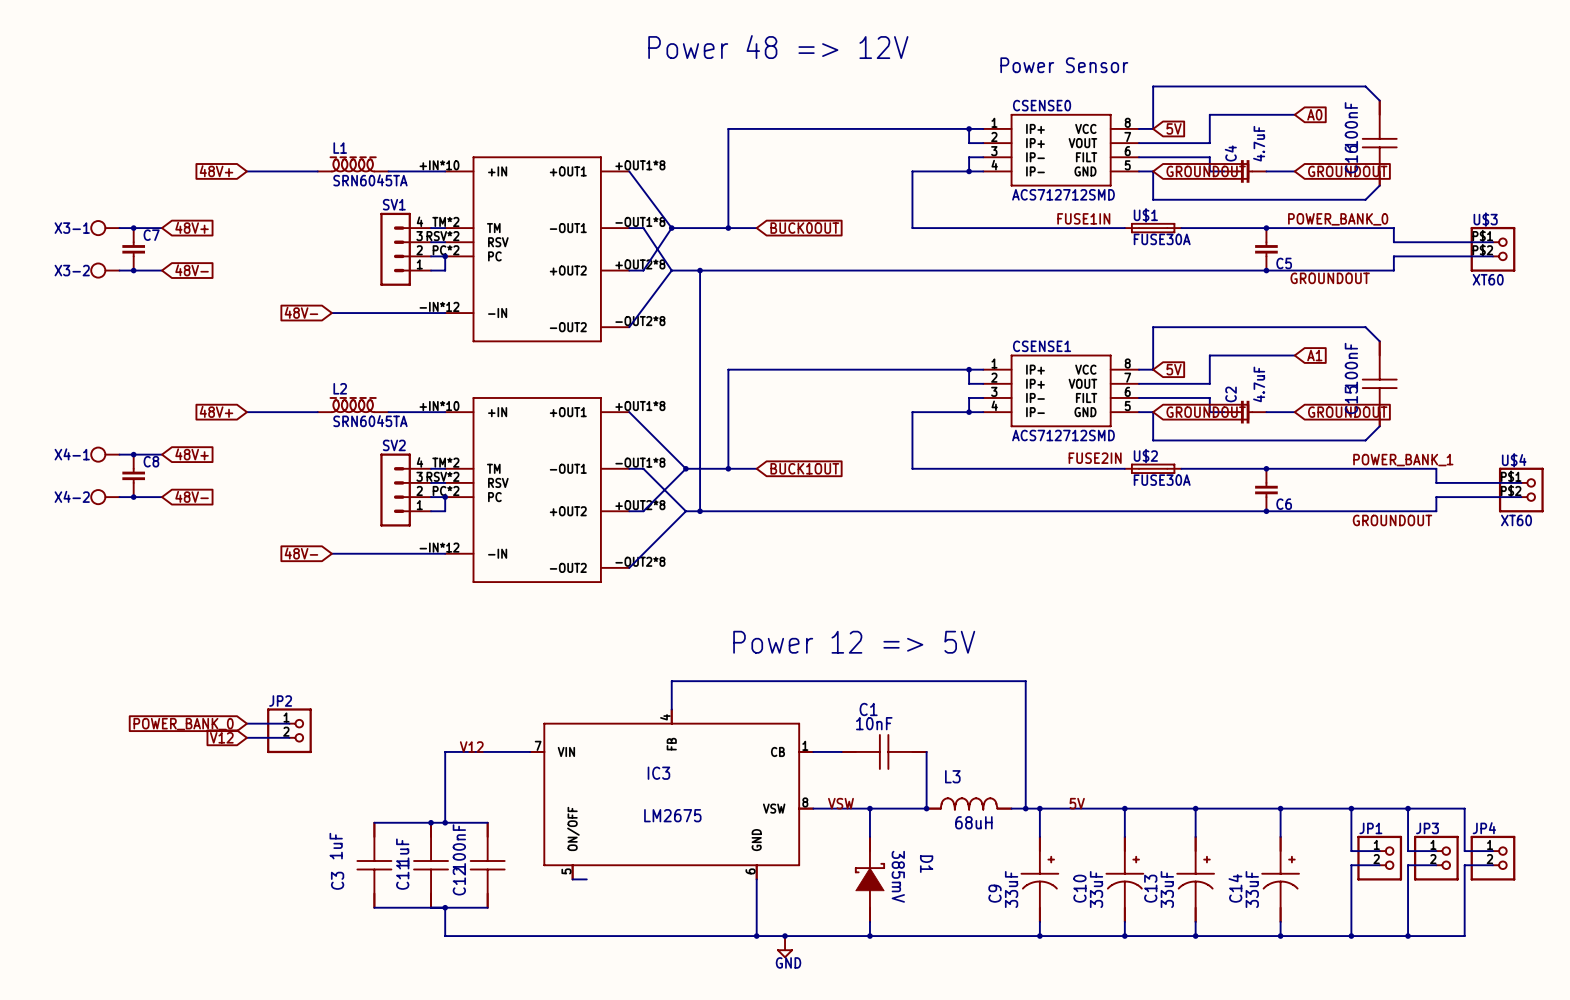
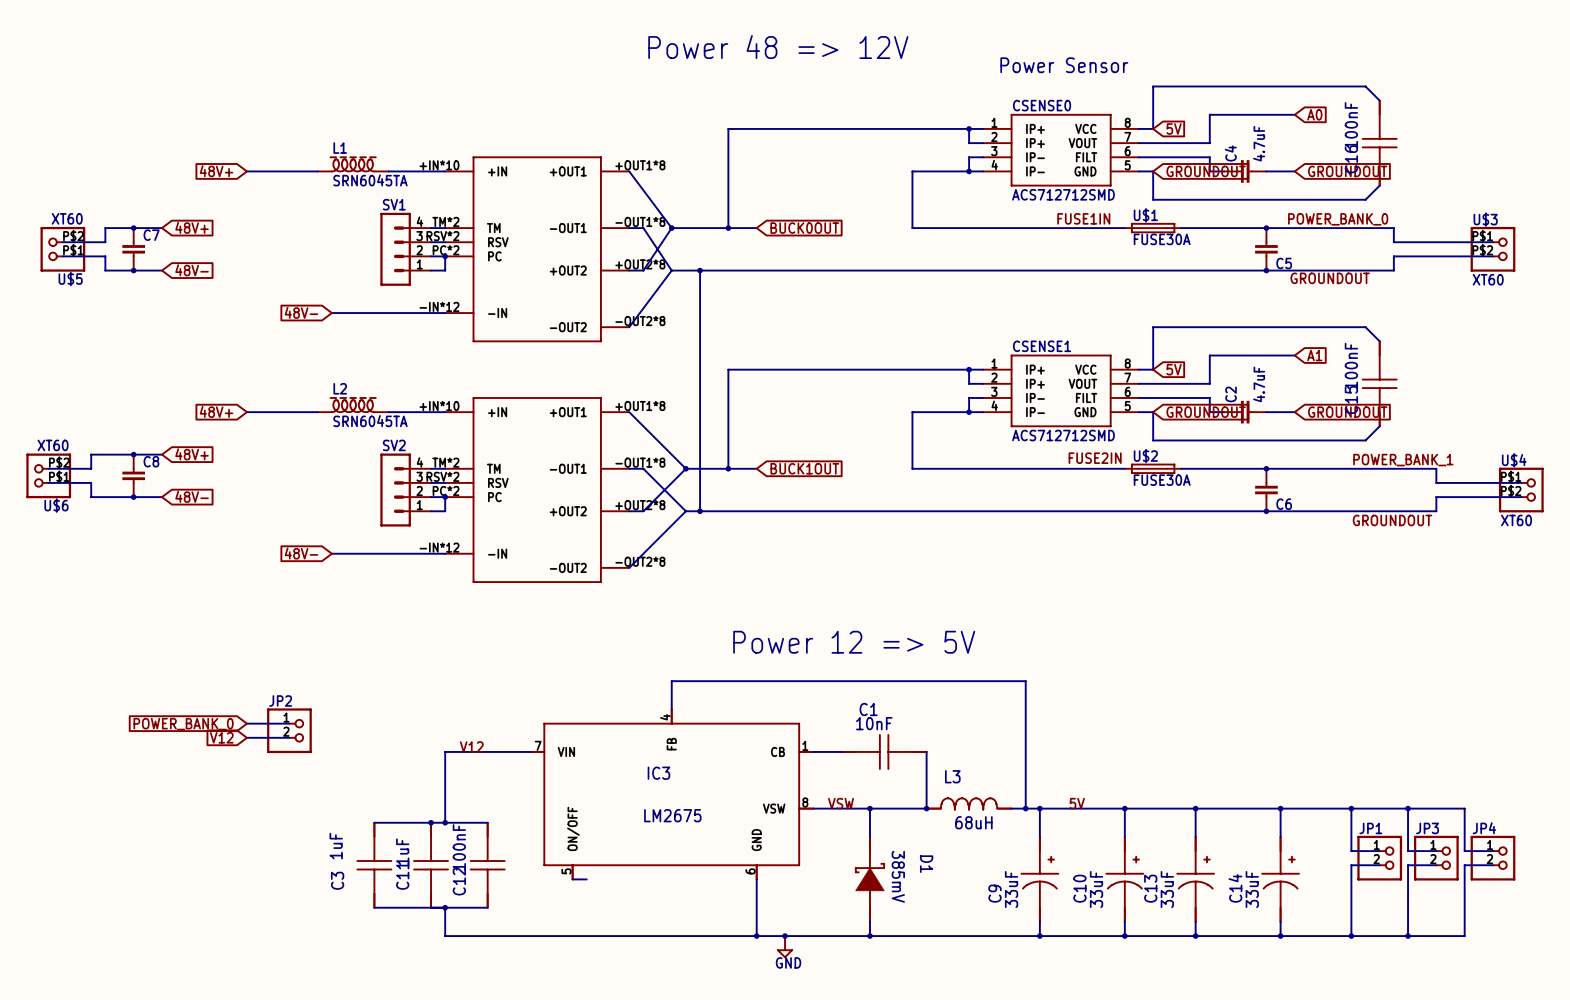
X3-1: (105, 228) -> none
wire: none -> (119, 228) (105, 228) (105, 242) (62, 242)
U$5: none -> XT60 (62, 249)
wire: none -> (62, 256) (105, 256) (105, 270) (119, 270)
X3-2: (105, 270) -> none
X4-1: (105, 454) -> none
wire: none -> (119, 454) (91, 454) (91, 468) (48, 468)
U$6: none -> XT60 (48, 475)
wire: none -> (48, 482) (91, 482) (91, 497) (119, 497)
X4-2: (105, 497) -> none

